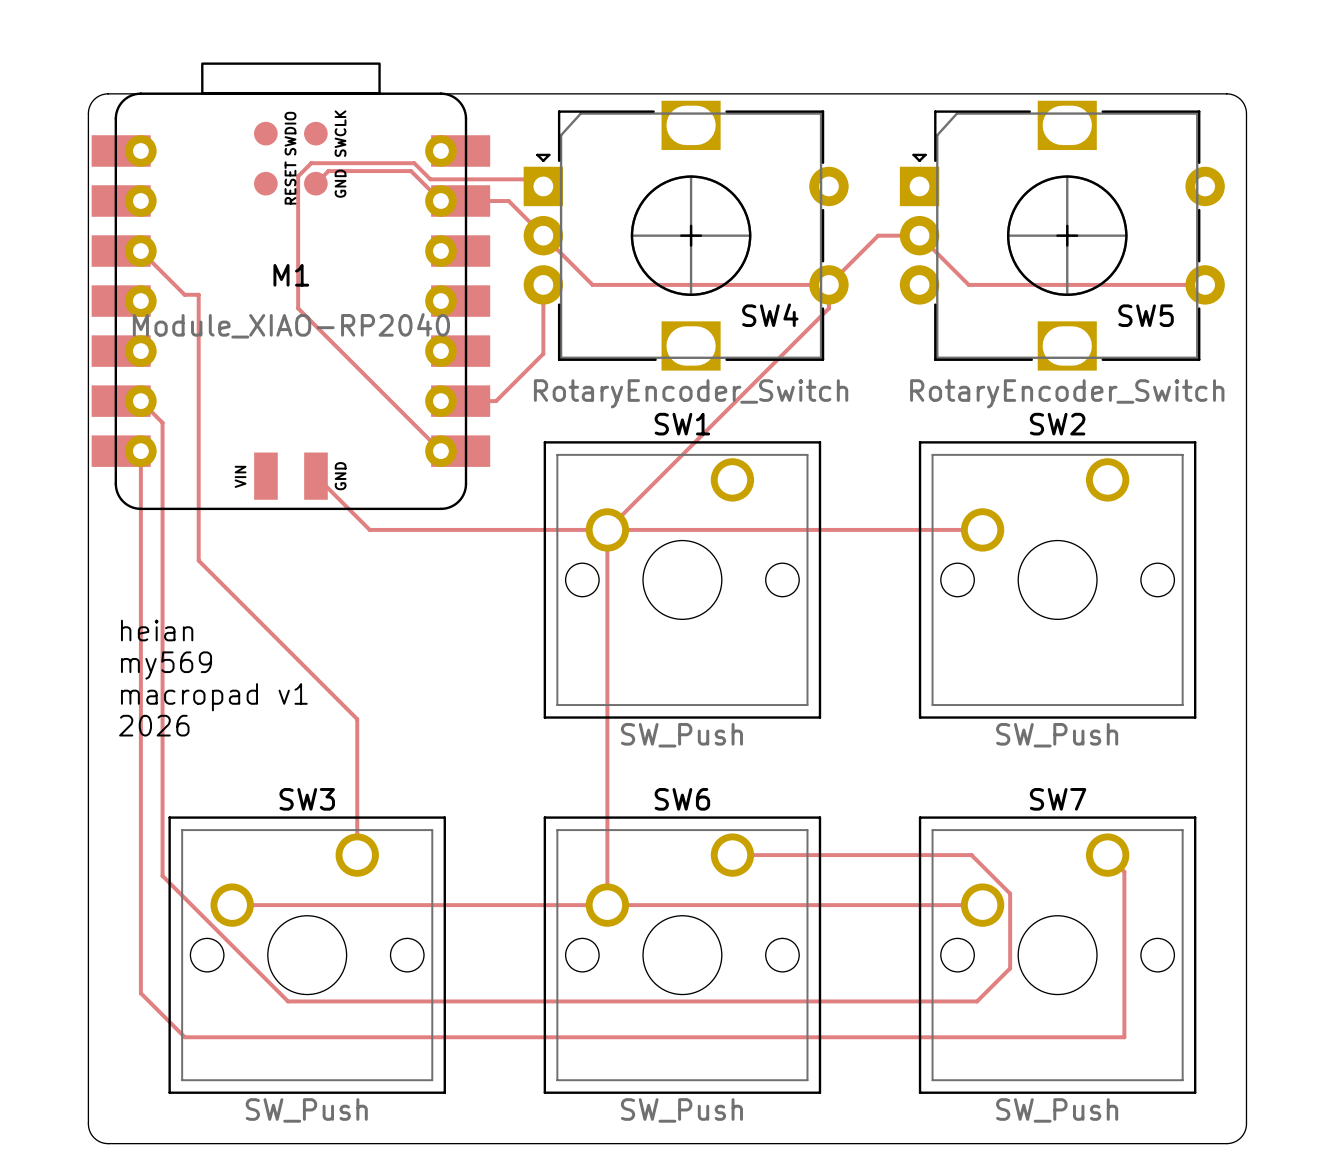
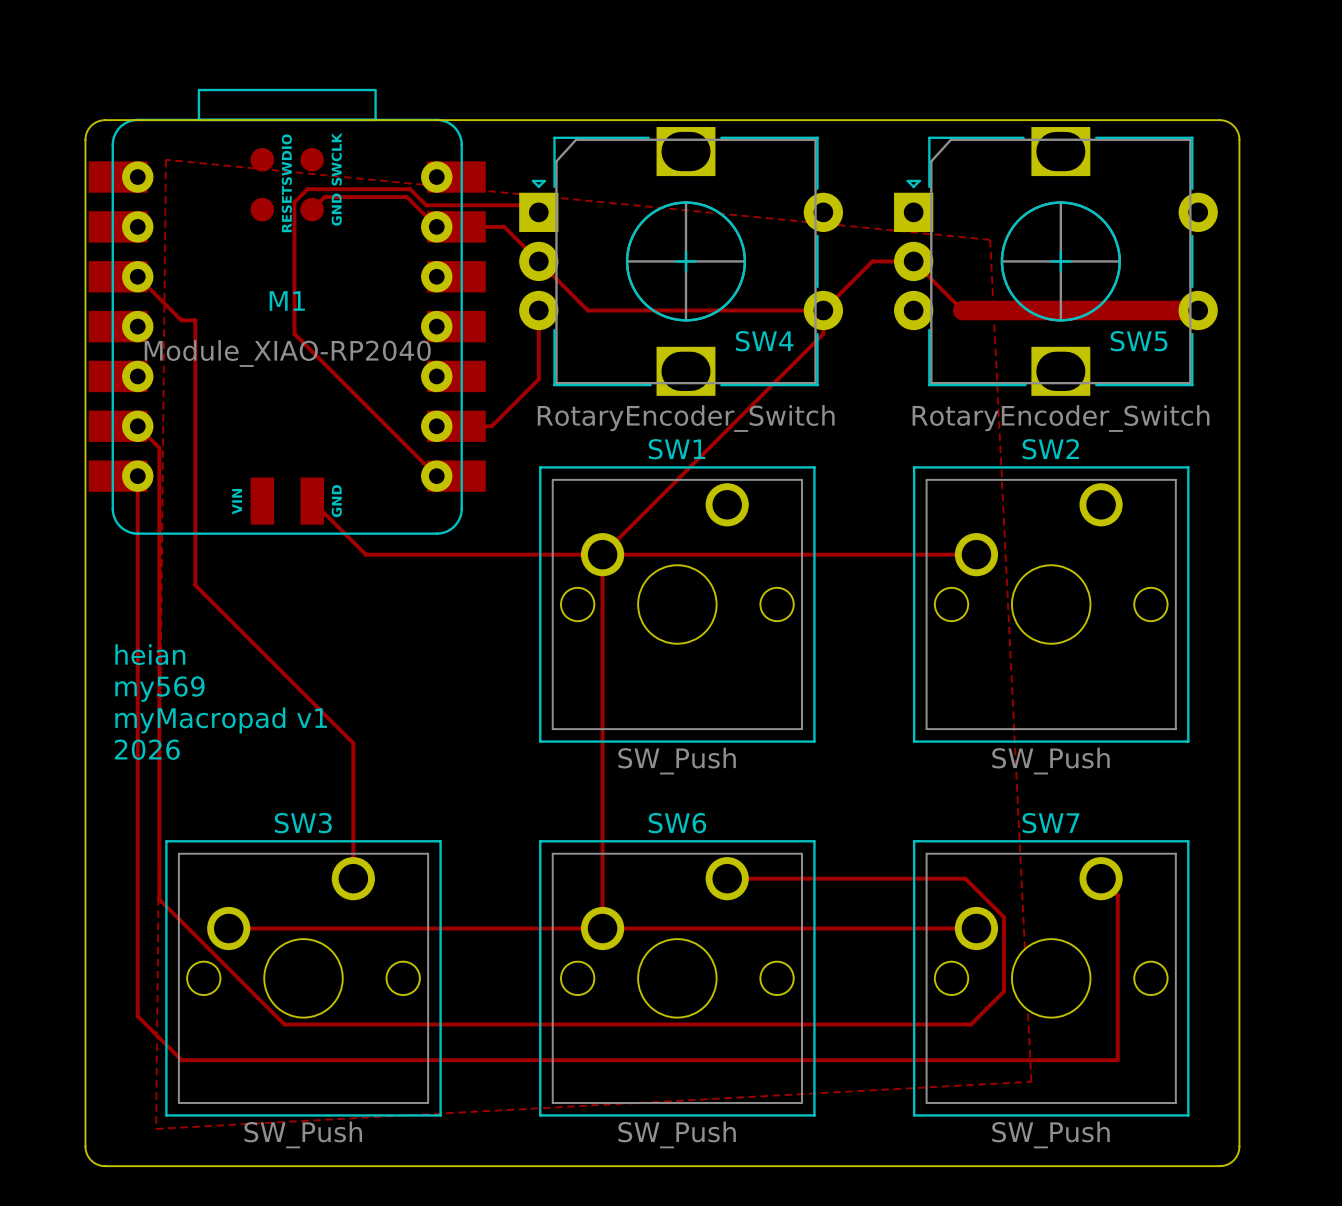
zone outline: none -> (165, 159) (156, 1128) (1031, 1081) (990, 239) (165, 159)
track width: thin (968, 284) (1205, 284) -> thick (962, 310) (1198, 310)
text: macropad v1 (214, 697) -> myMacropad v1 (221, 720)

